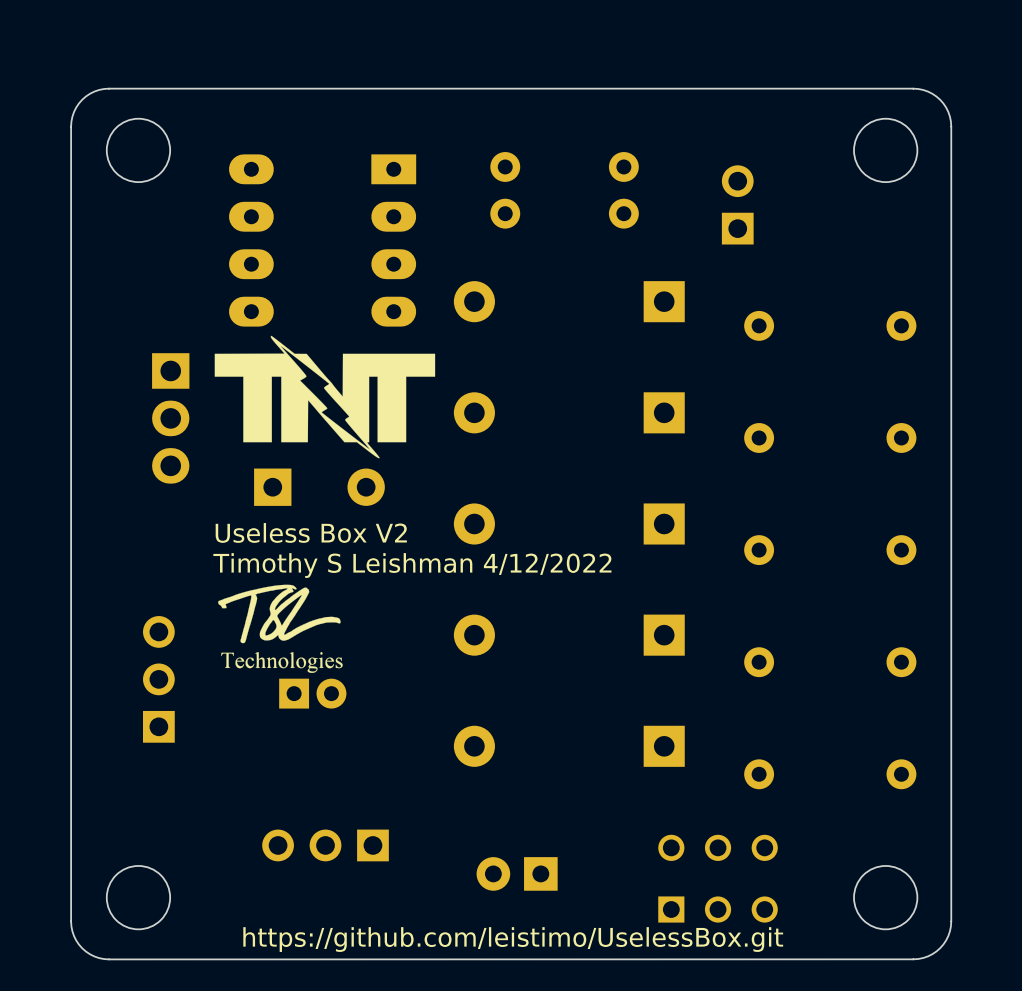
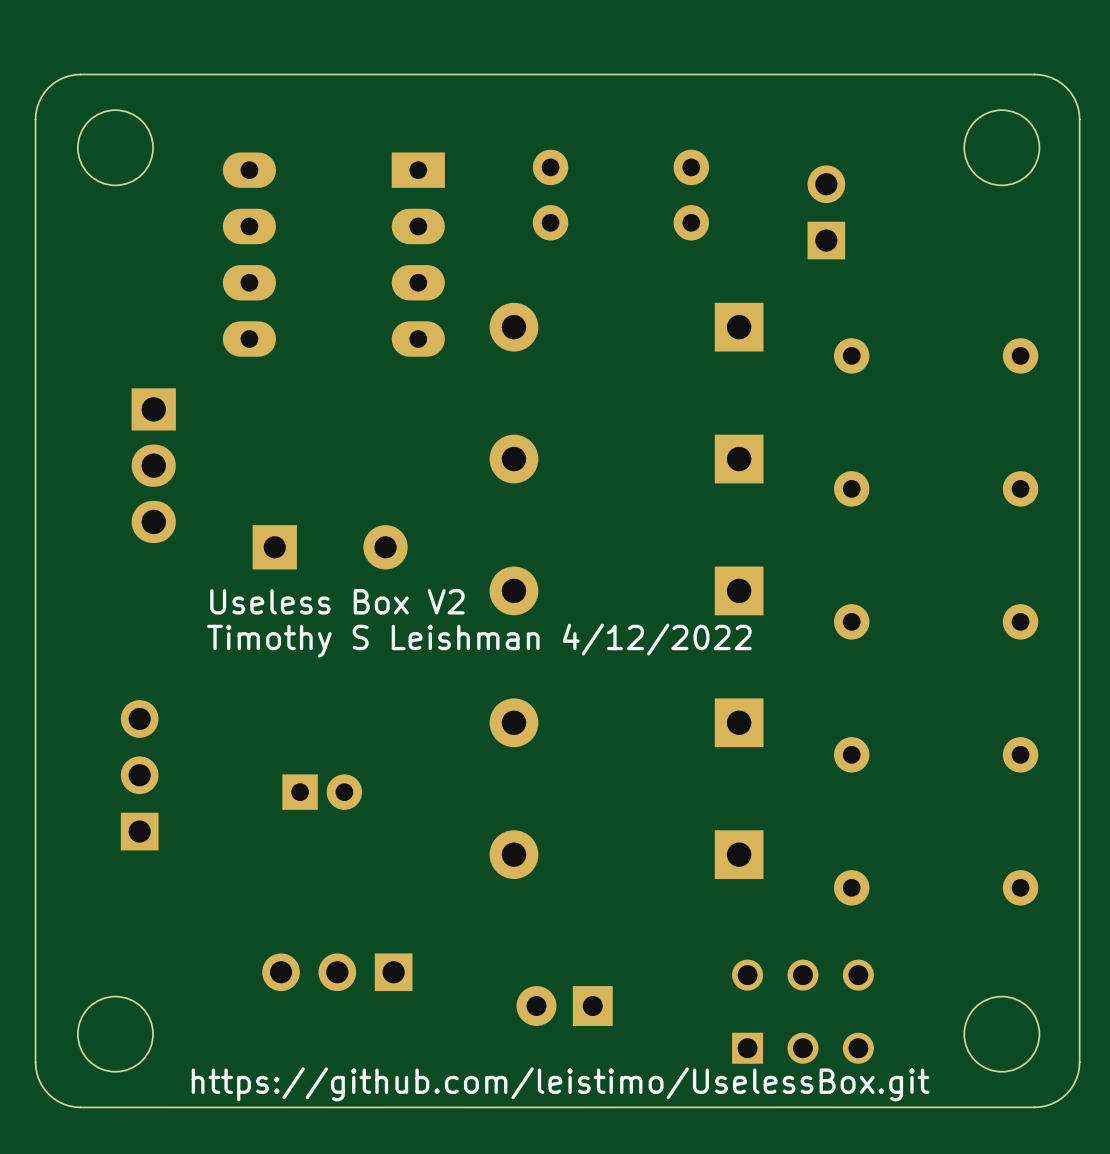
drawing: [214, 335, 436, 459] -> none
drawing: [218, 584, 343, 673] -> none

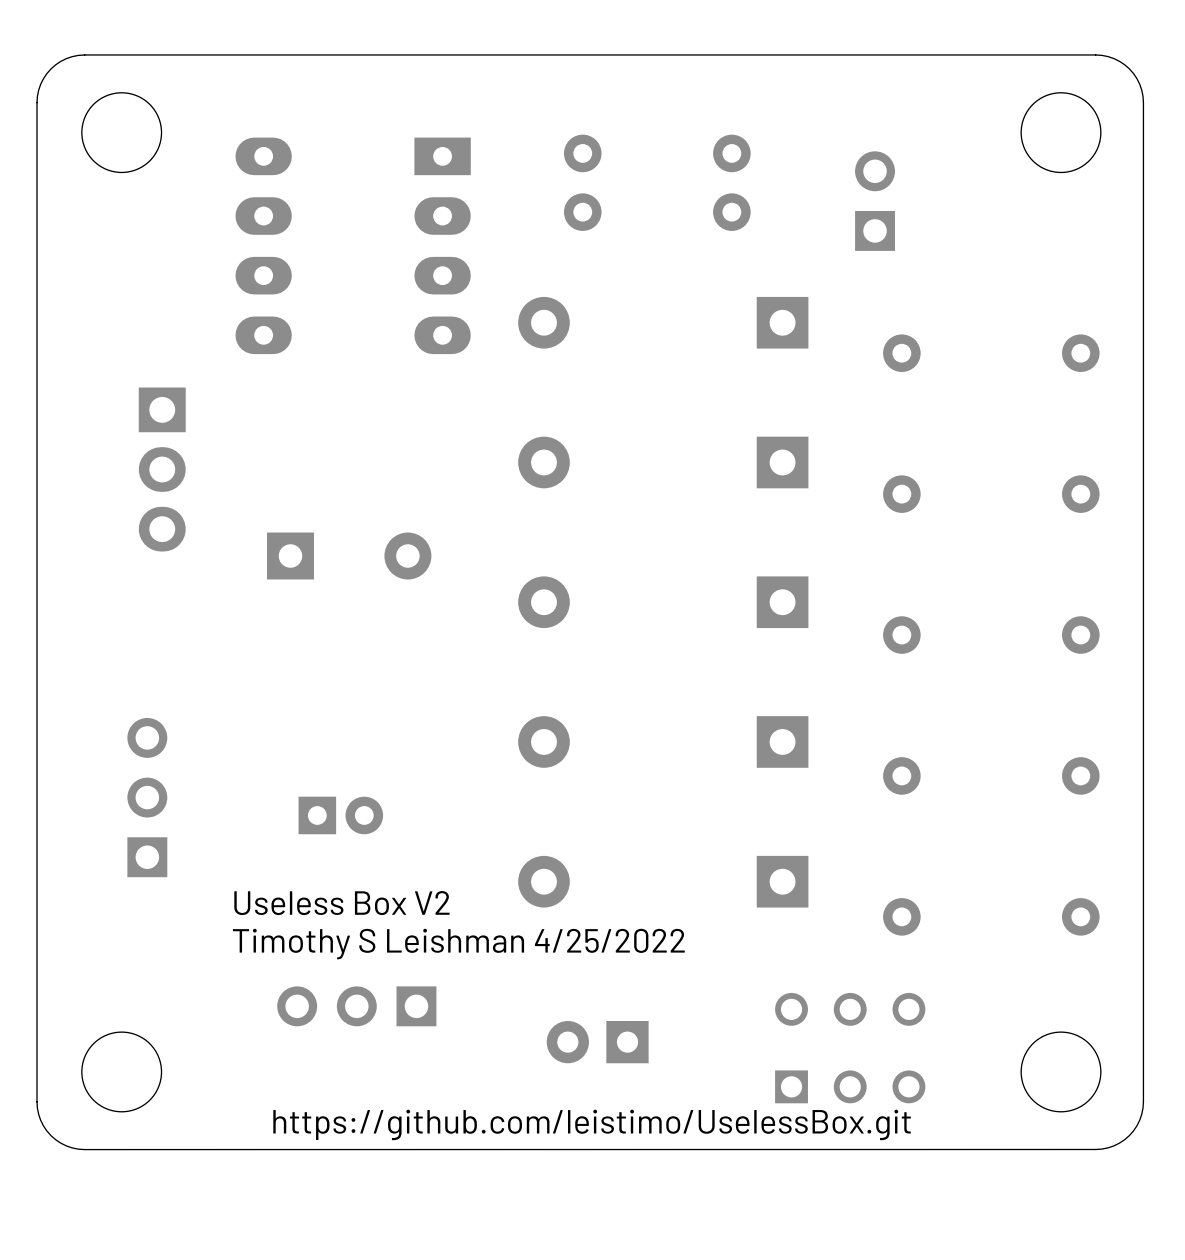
text position: Useless Box V2 (337, 601) -> Useless Box V2 (341, 903)
text: Timothy S Leishman 4/12/2022 (479, 640) -> none
text: none -> Timothy S Leishman 4/25/2022 (458, 944)

